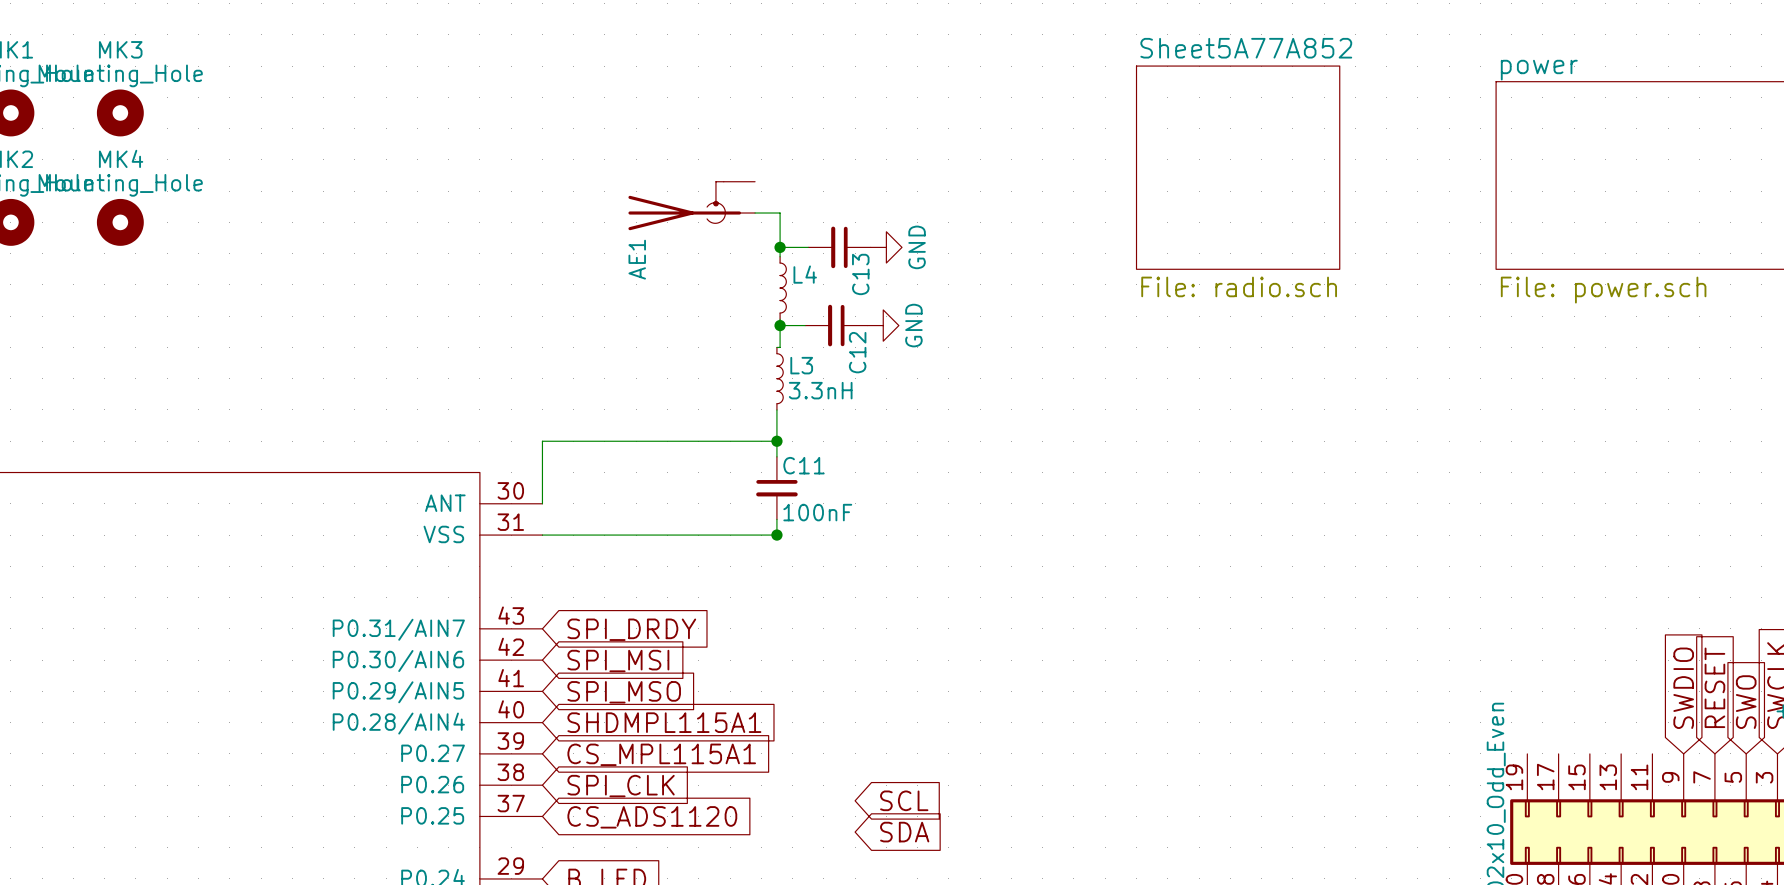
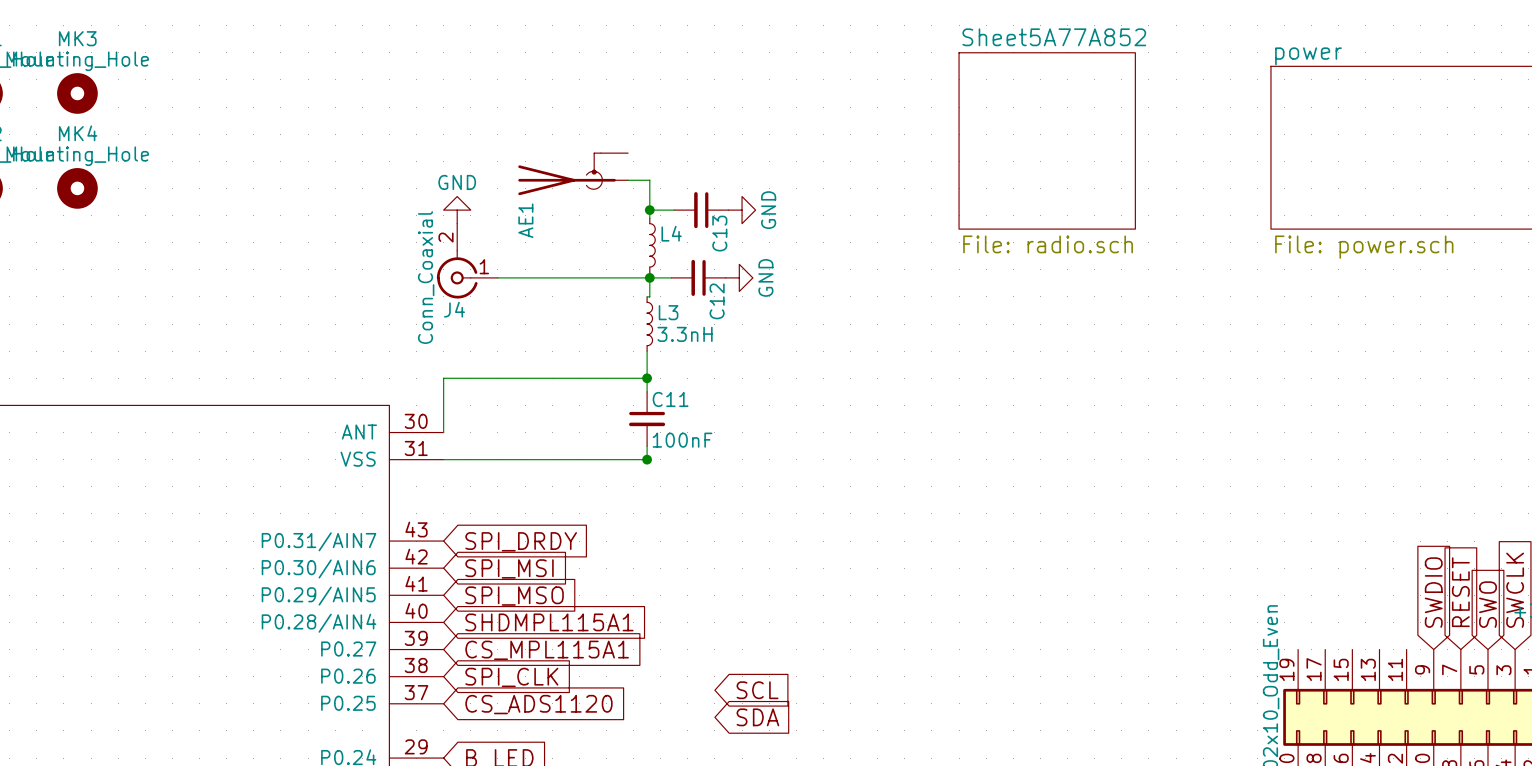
power symbol: none -> GND (457, 210)
J4: none -> Conn_Coaxial (467, 261)
wire: none -> (497, 277) (649, 277)

